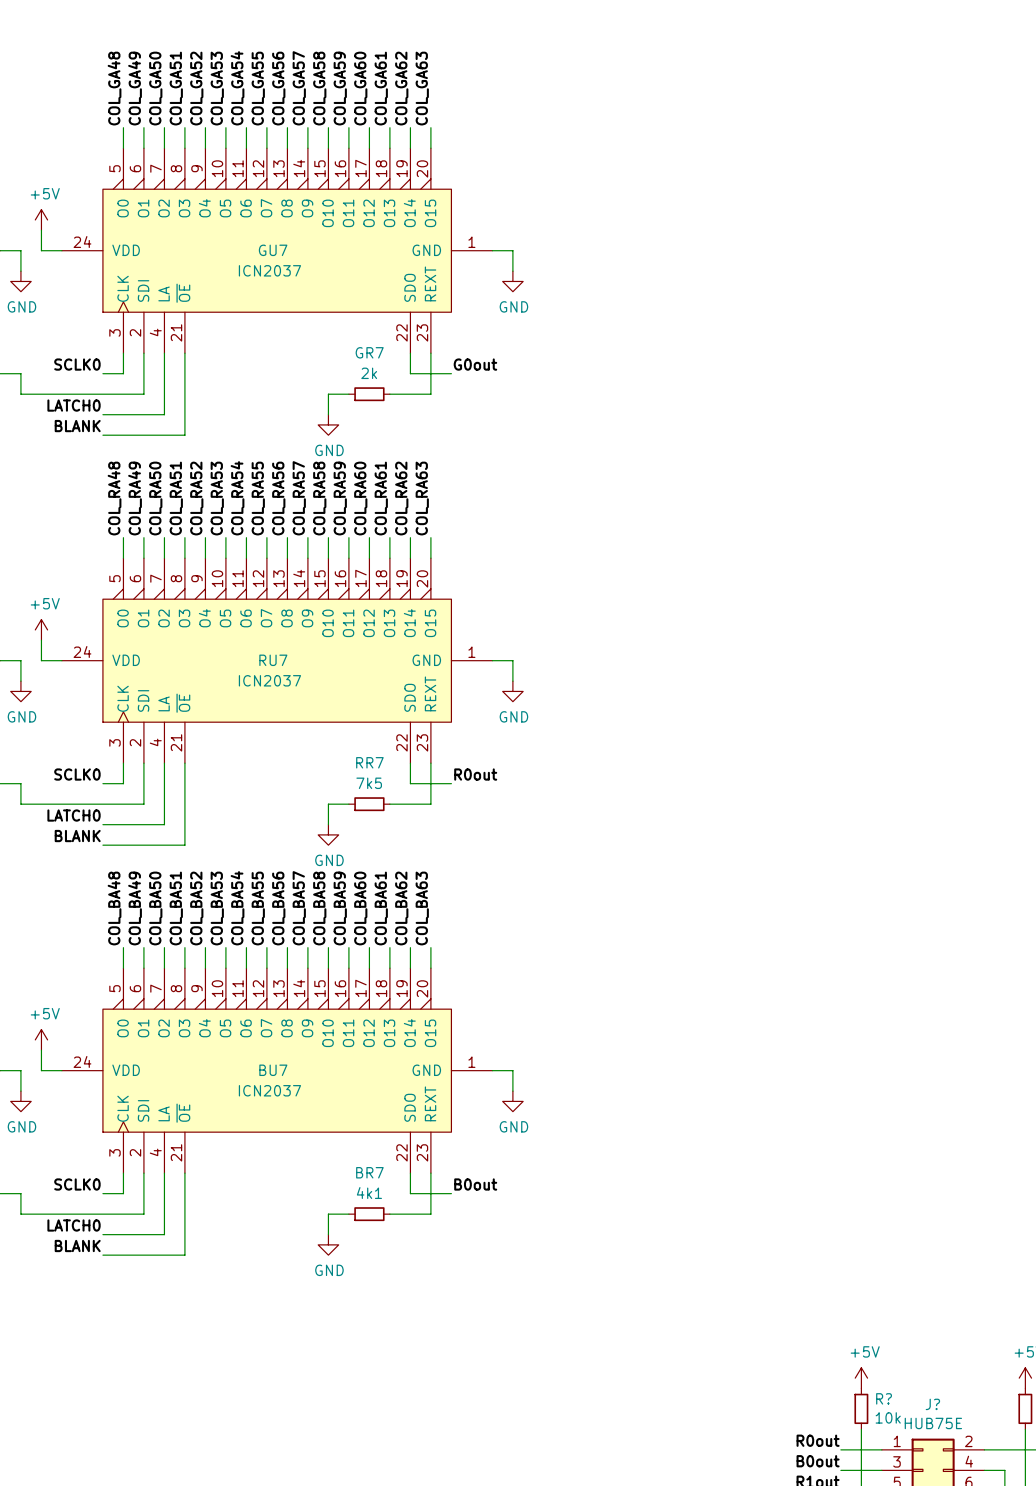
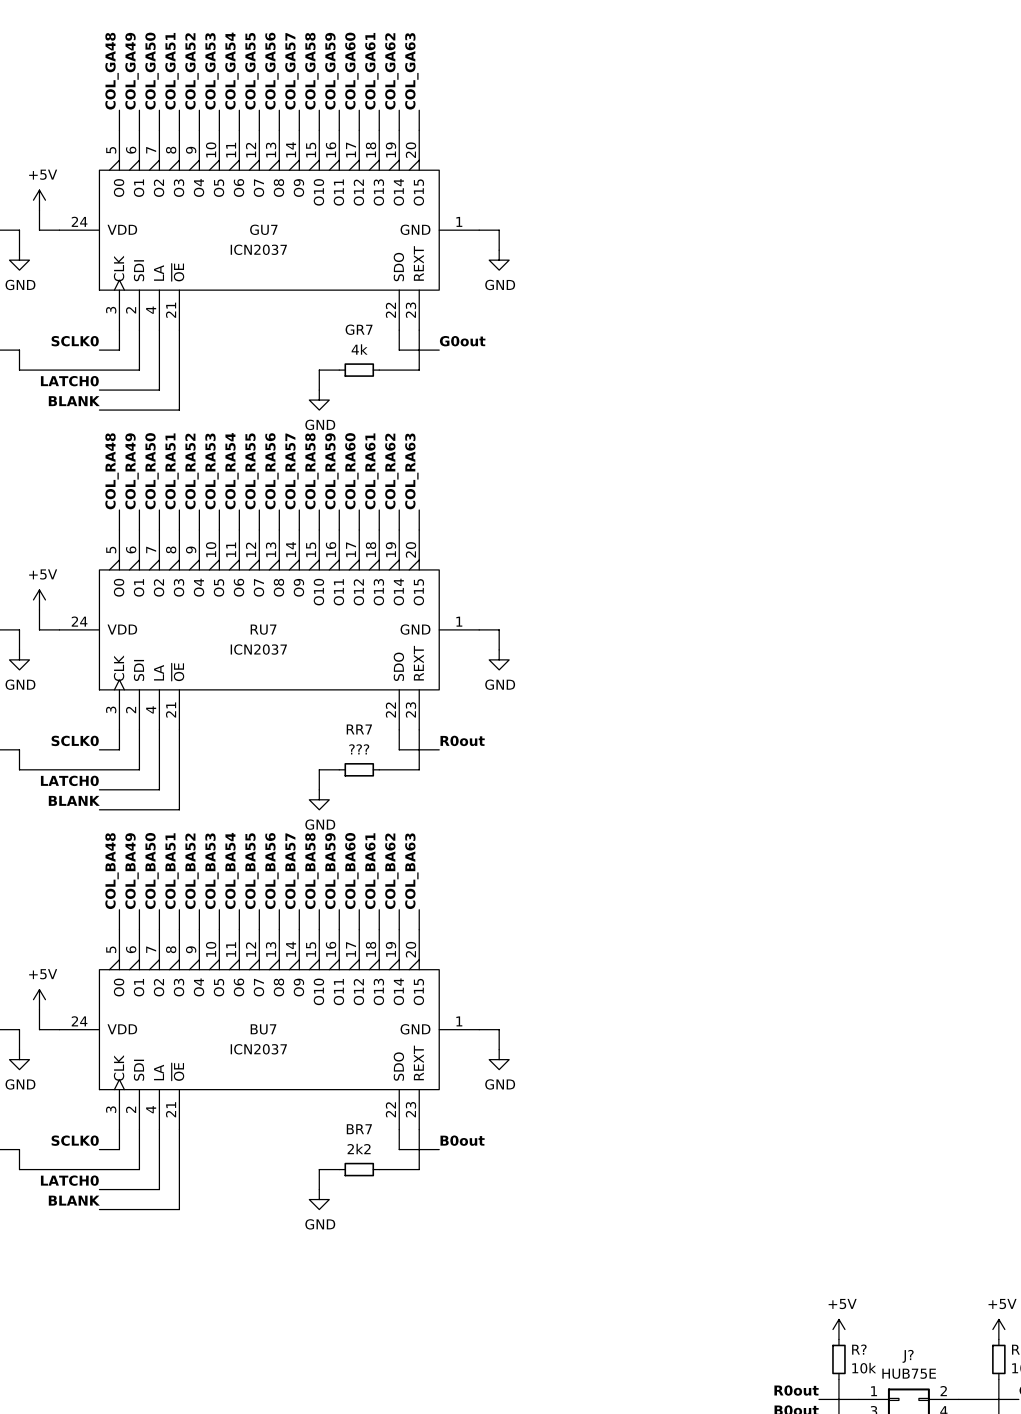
GR7 value: 2k (369, 373) -> 4k (359, 349)
RR7 value: 7k5 (369, 783) -> ??? (359, 749)
BR7 value: 4k1 (369, 1193) -> 2k2 (359, 1149)

